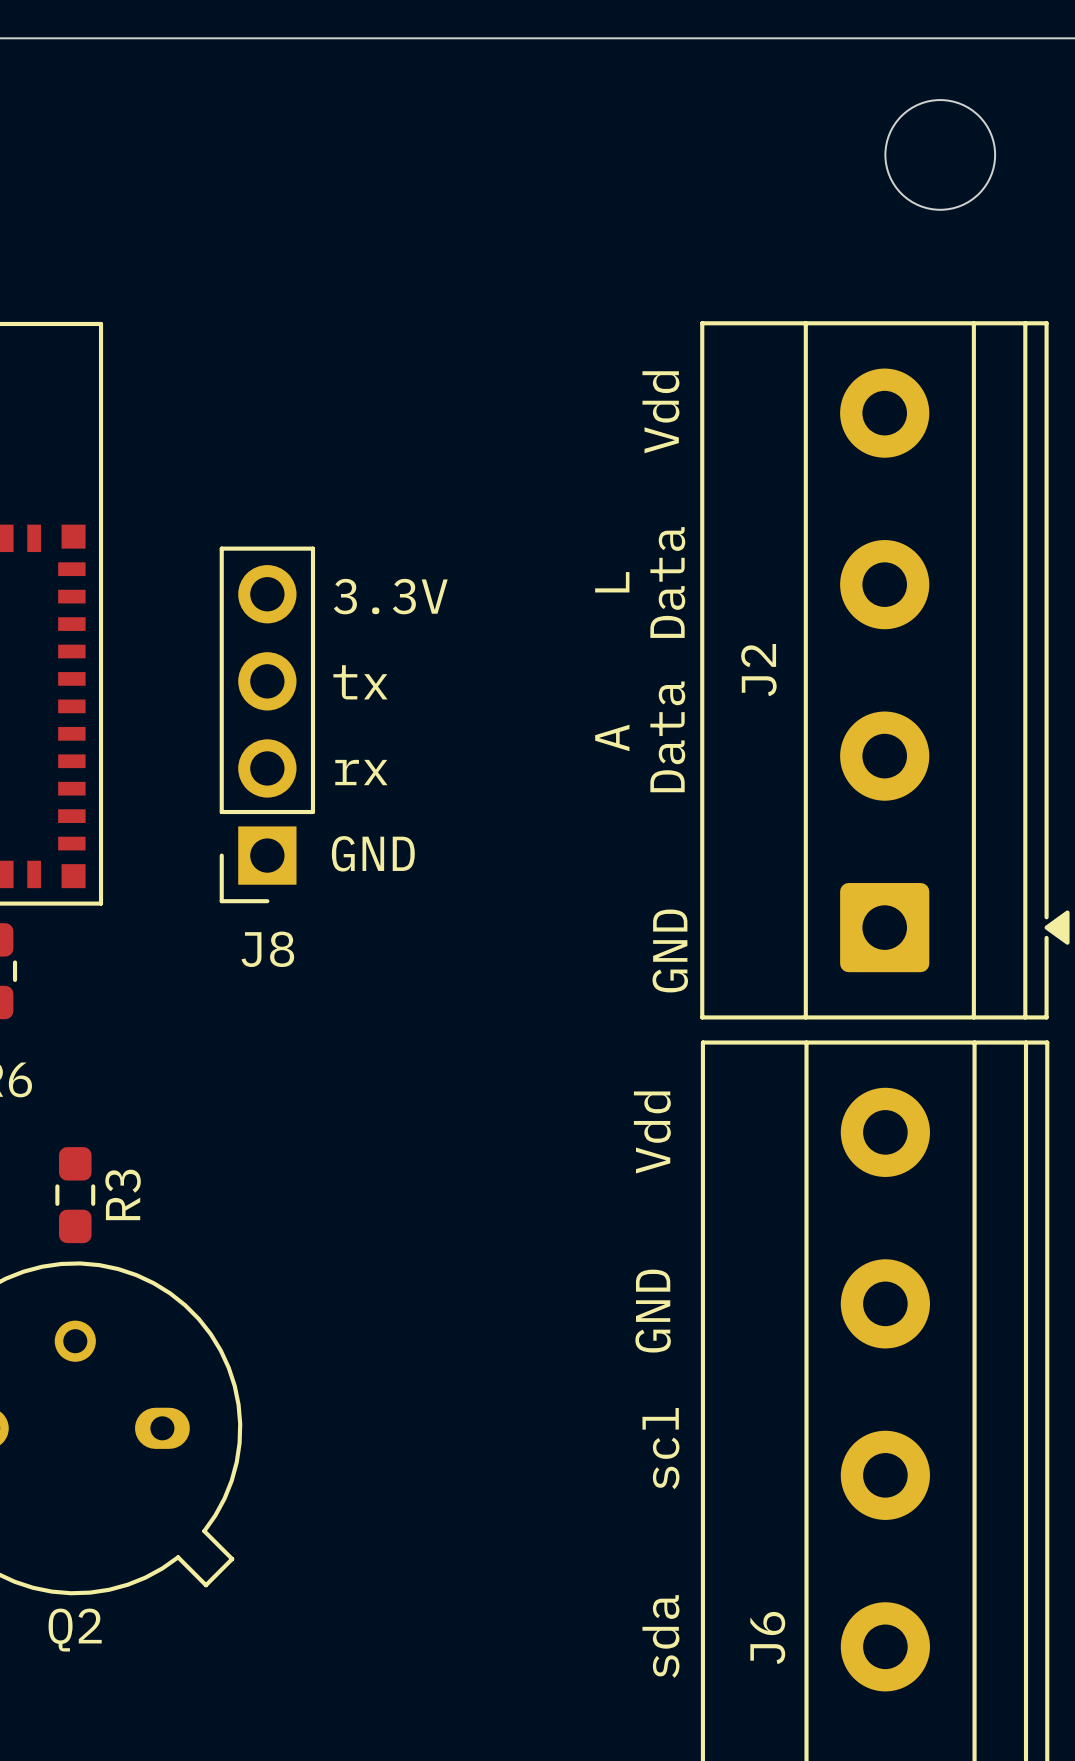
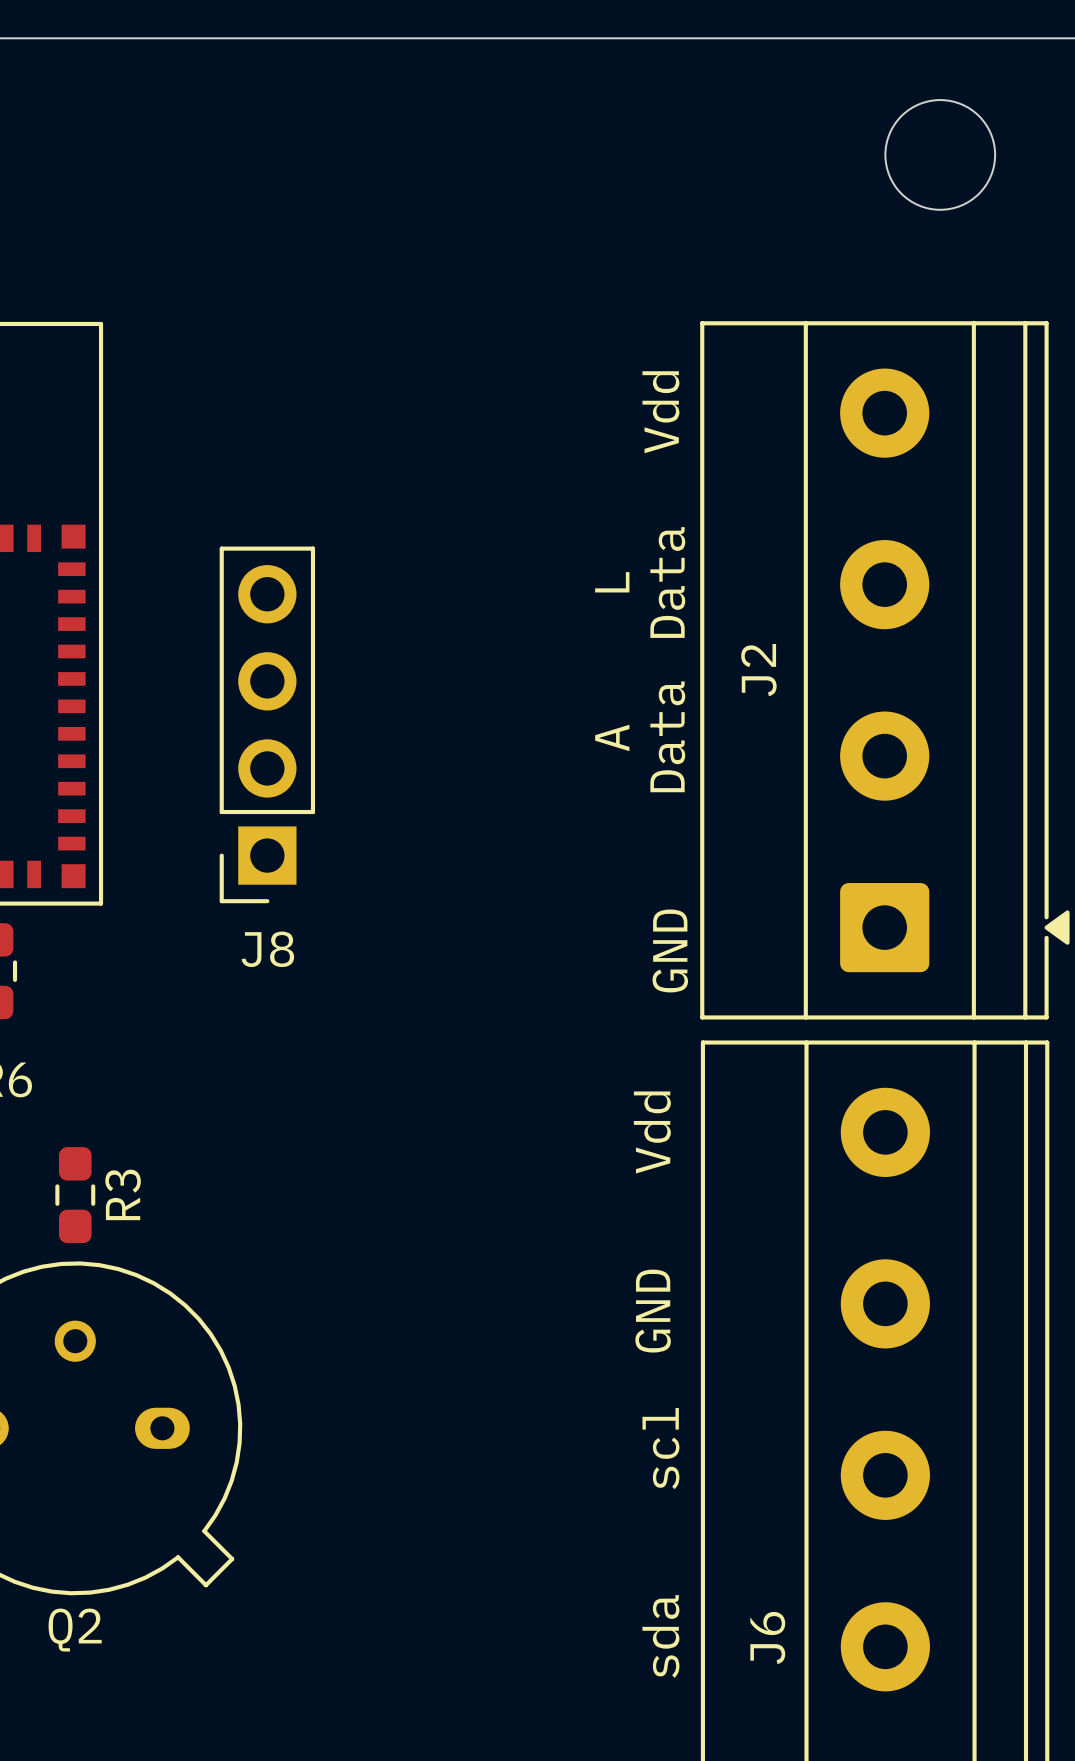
text: 3.3V (390, 596) -> none
text: tx (360, 682) -> none
text: rx (361, 772) -> none
text: GND (373, 853) -> none

